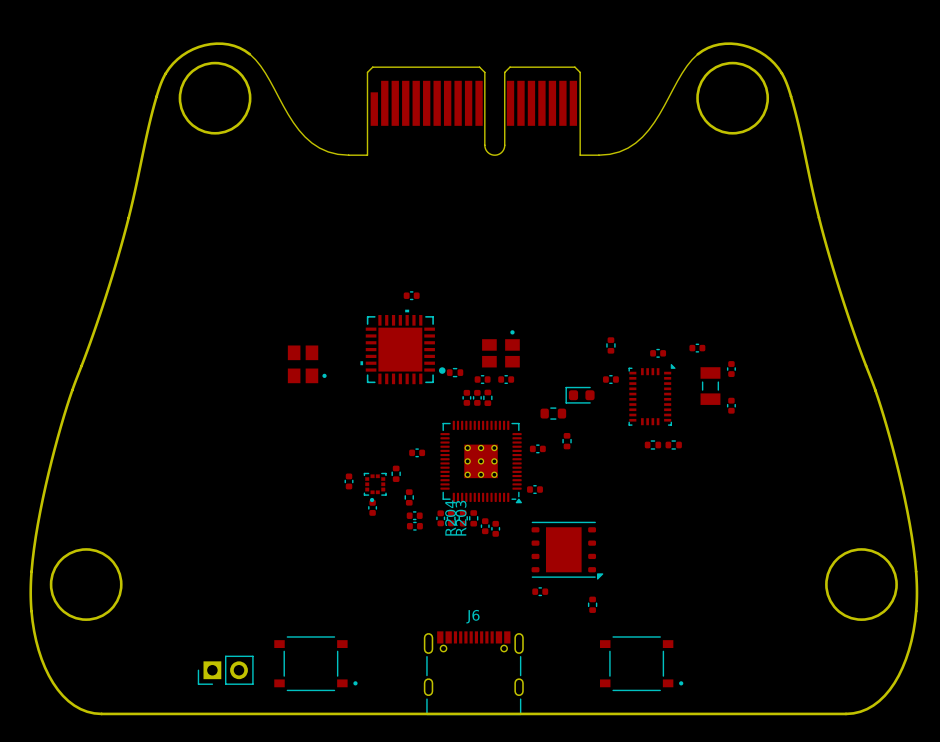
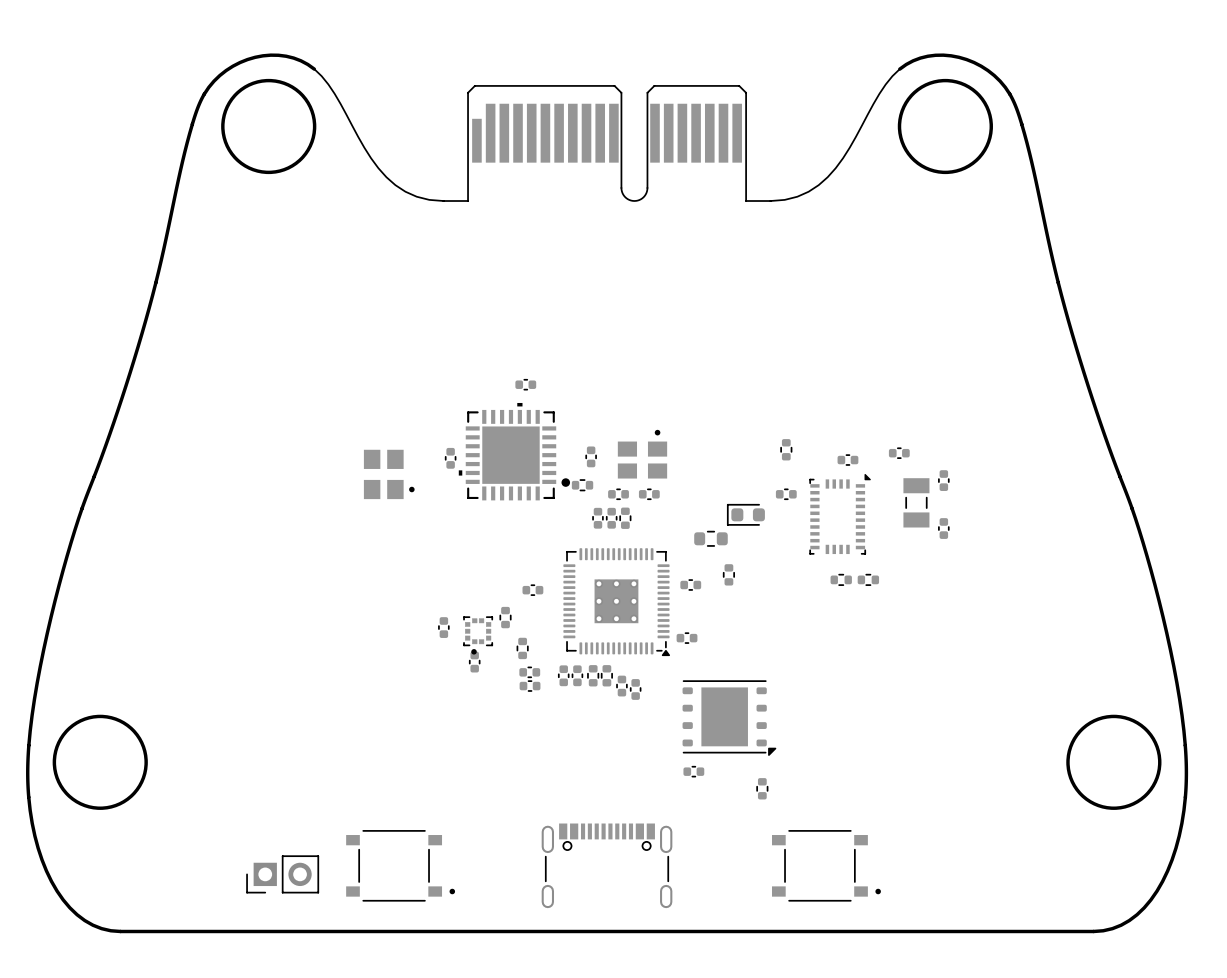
part: none -> (591, 456)
part: none -> (450, 458)
R204 name: R204 (450, 518) -> none
R203 name: R203 (461, 518) -> none
J6: (473, 673) -> none

